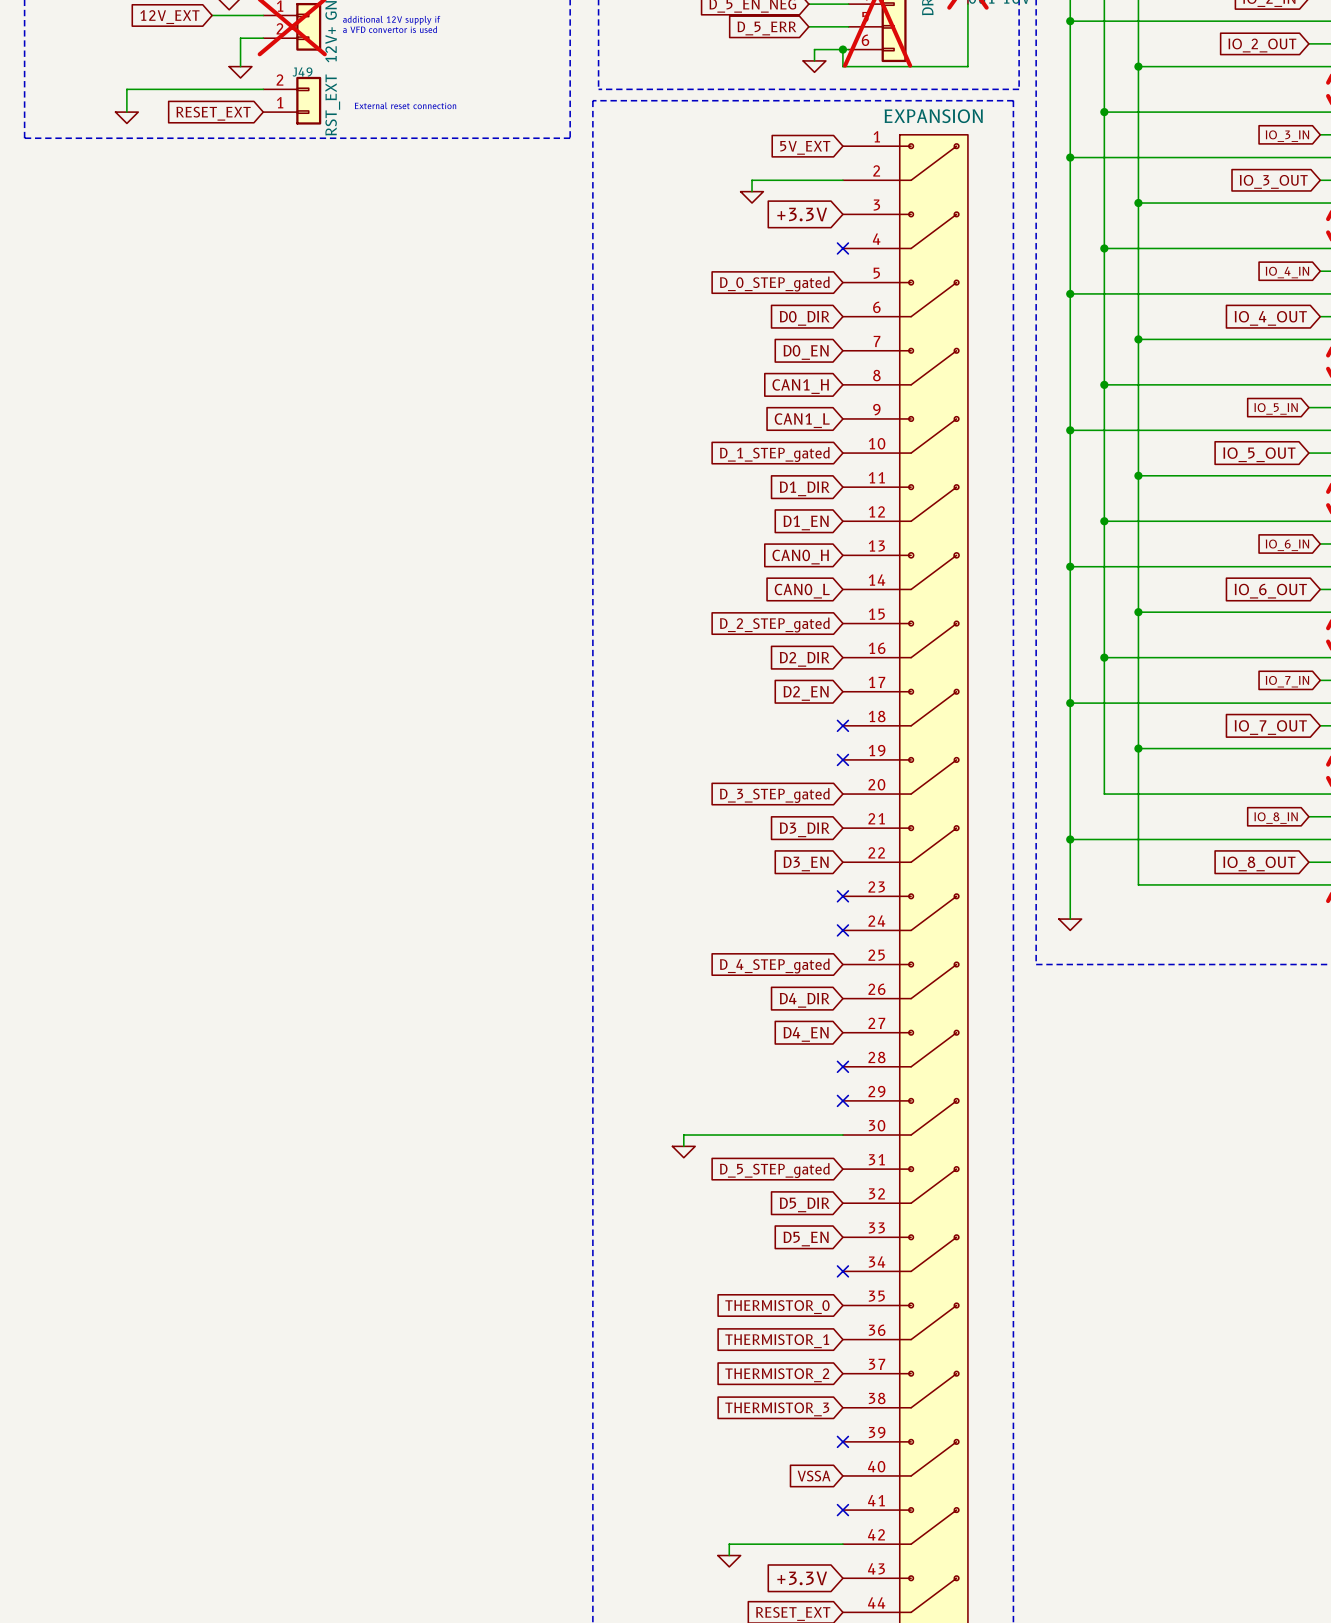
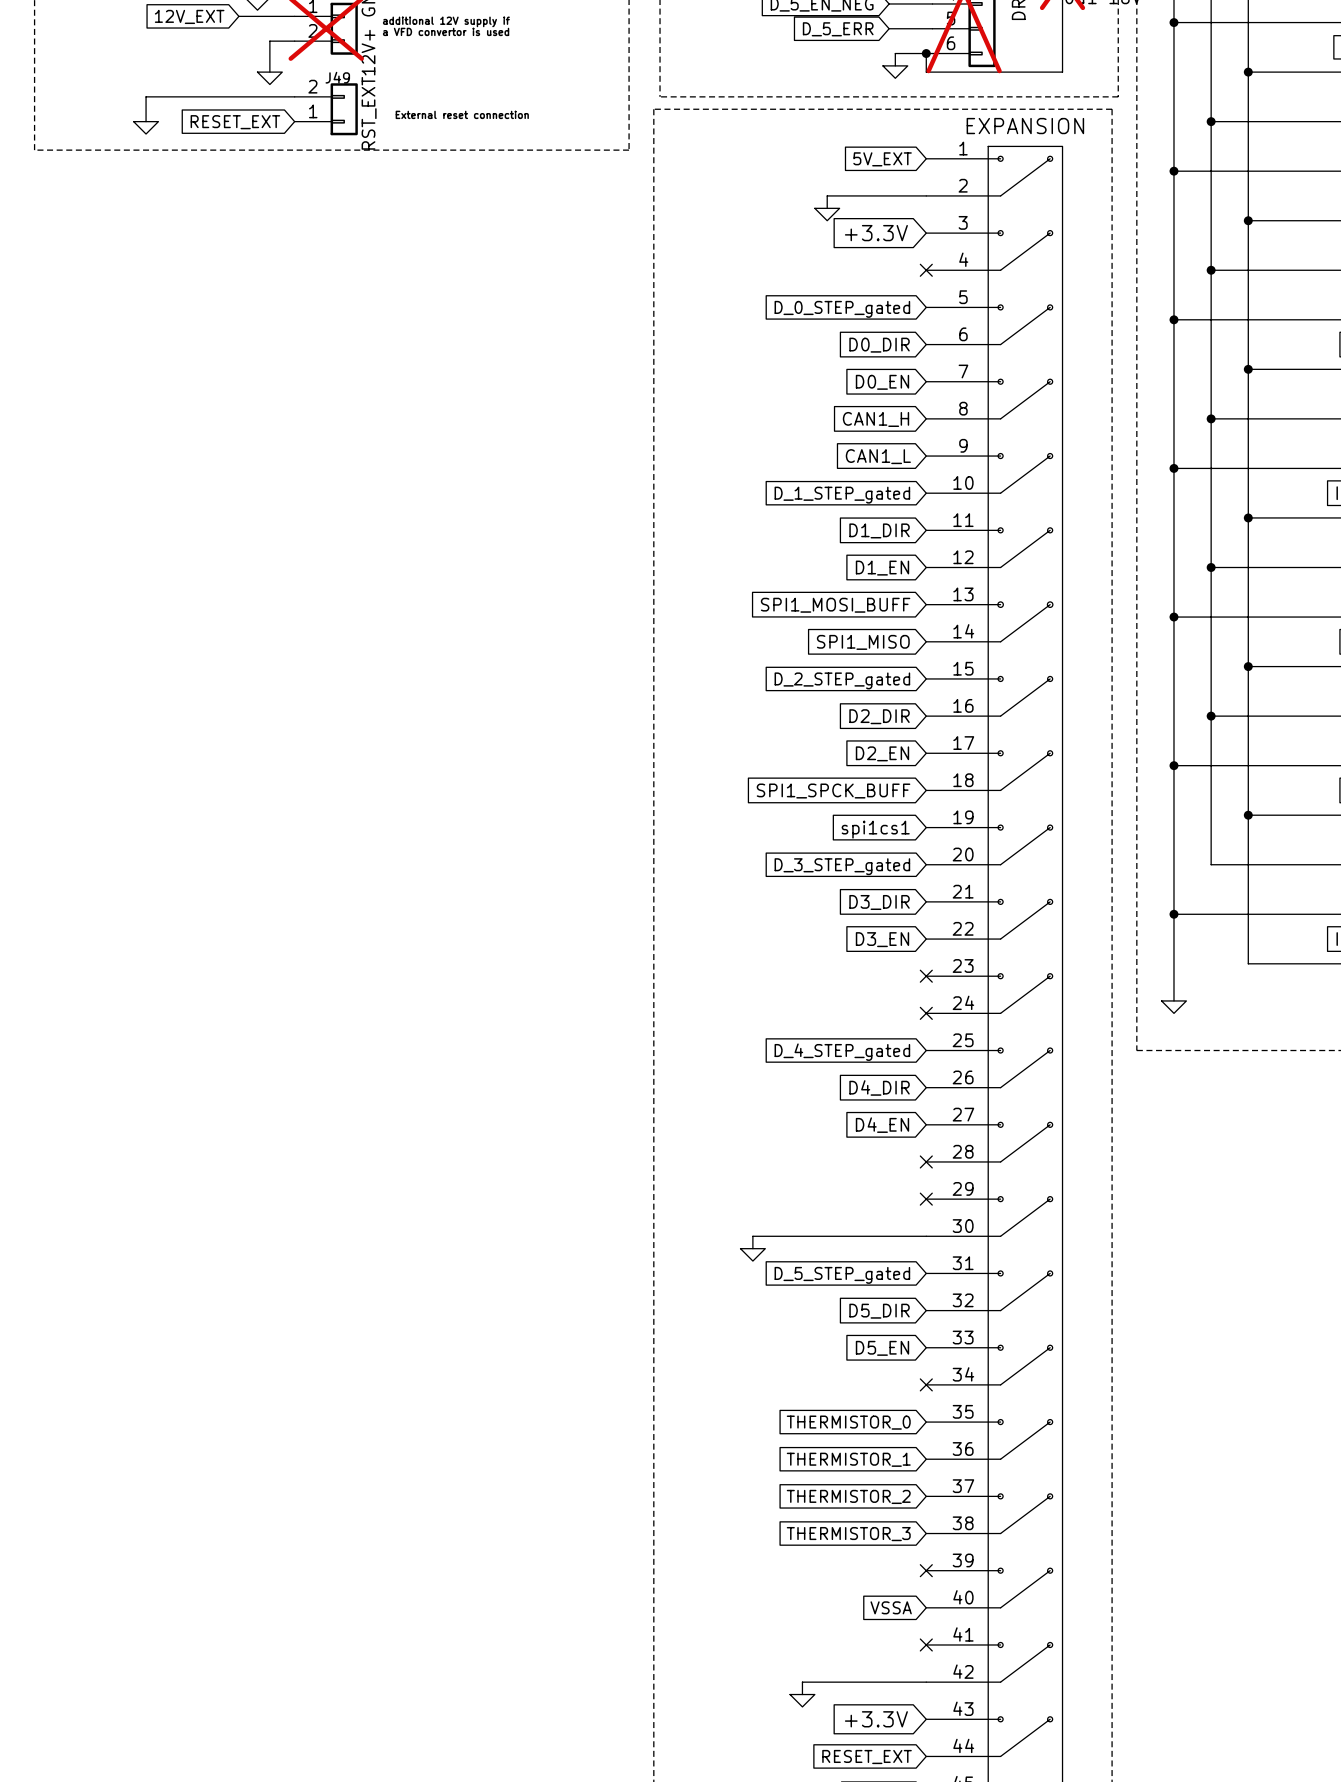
global label: CAN0_H (800, 557) -> SPI1_MOSI_BUFF (835, 605)
global label: CAN0_L (802, 591) -> SPI1_MISO (863, 642)
no-connect mark: (842, 725) -> none
global label: none -> SPI1_SPCK_BUFF (833, 791)
no-connect mark: (842, 759) -> none
global label: none -> spi1cs1 (875, 829)

